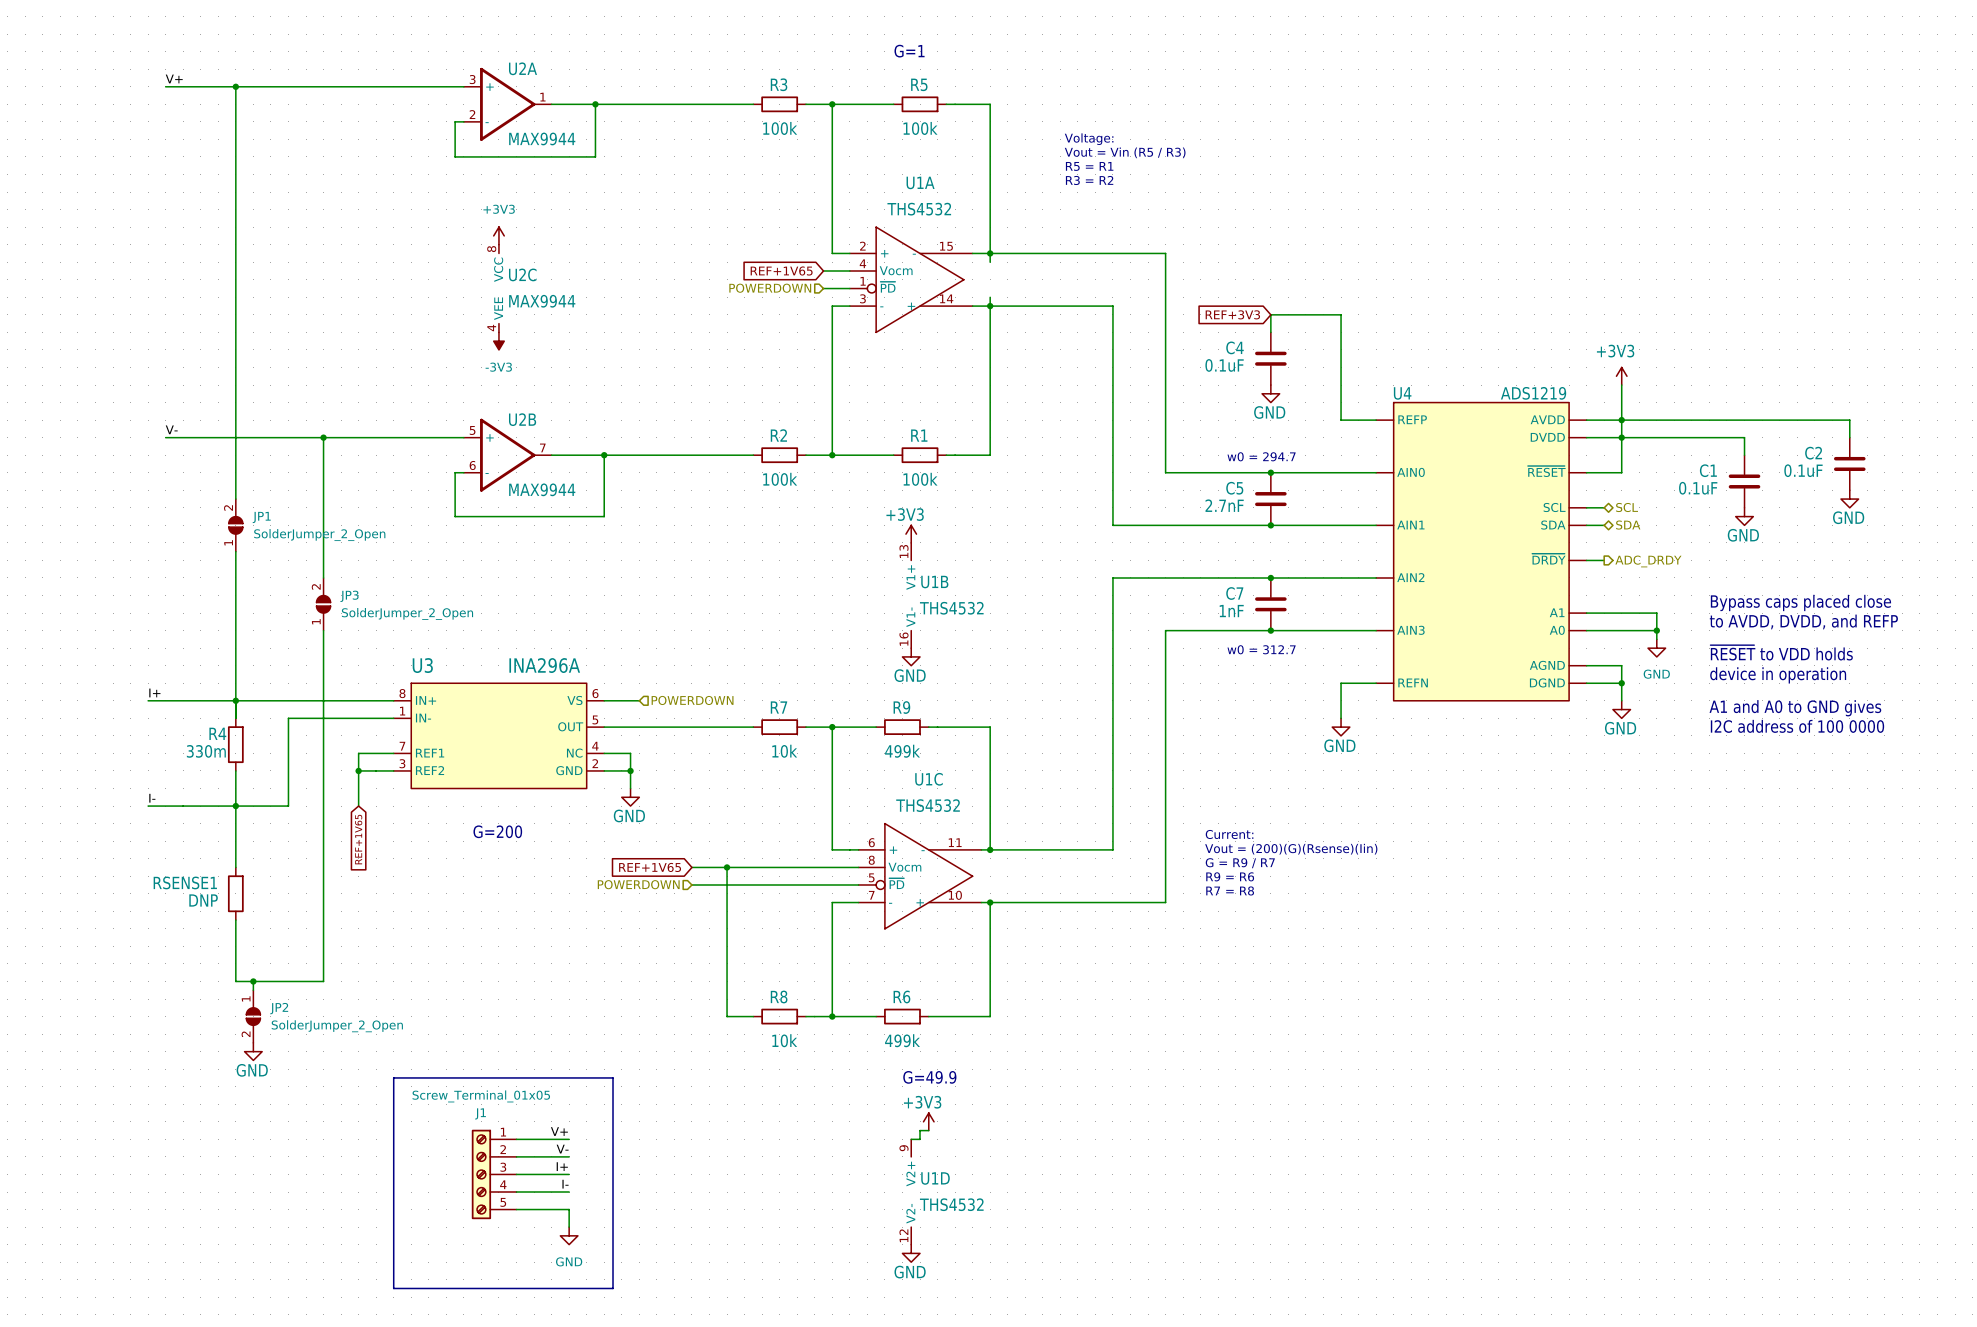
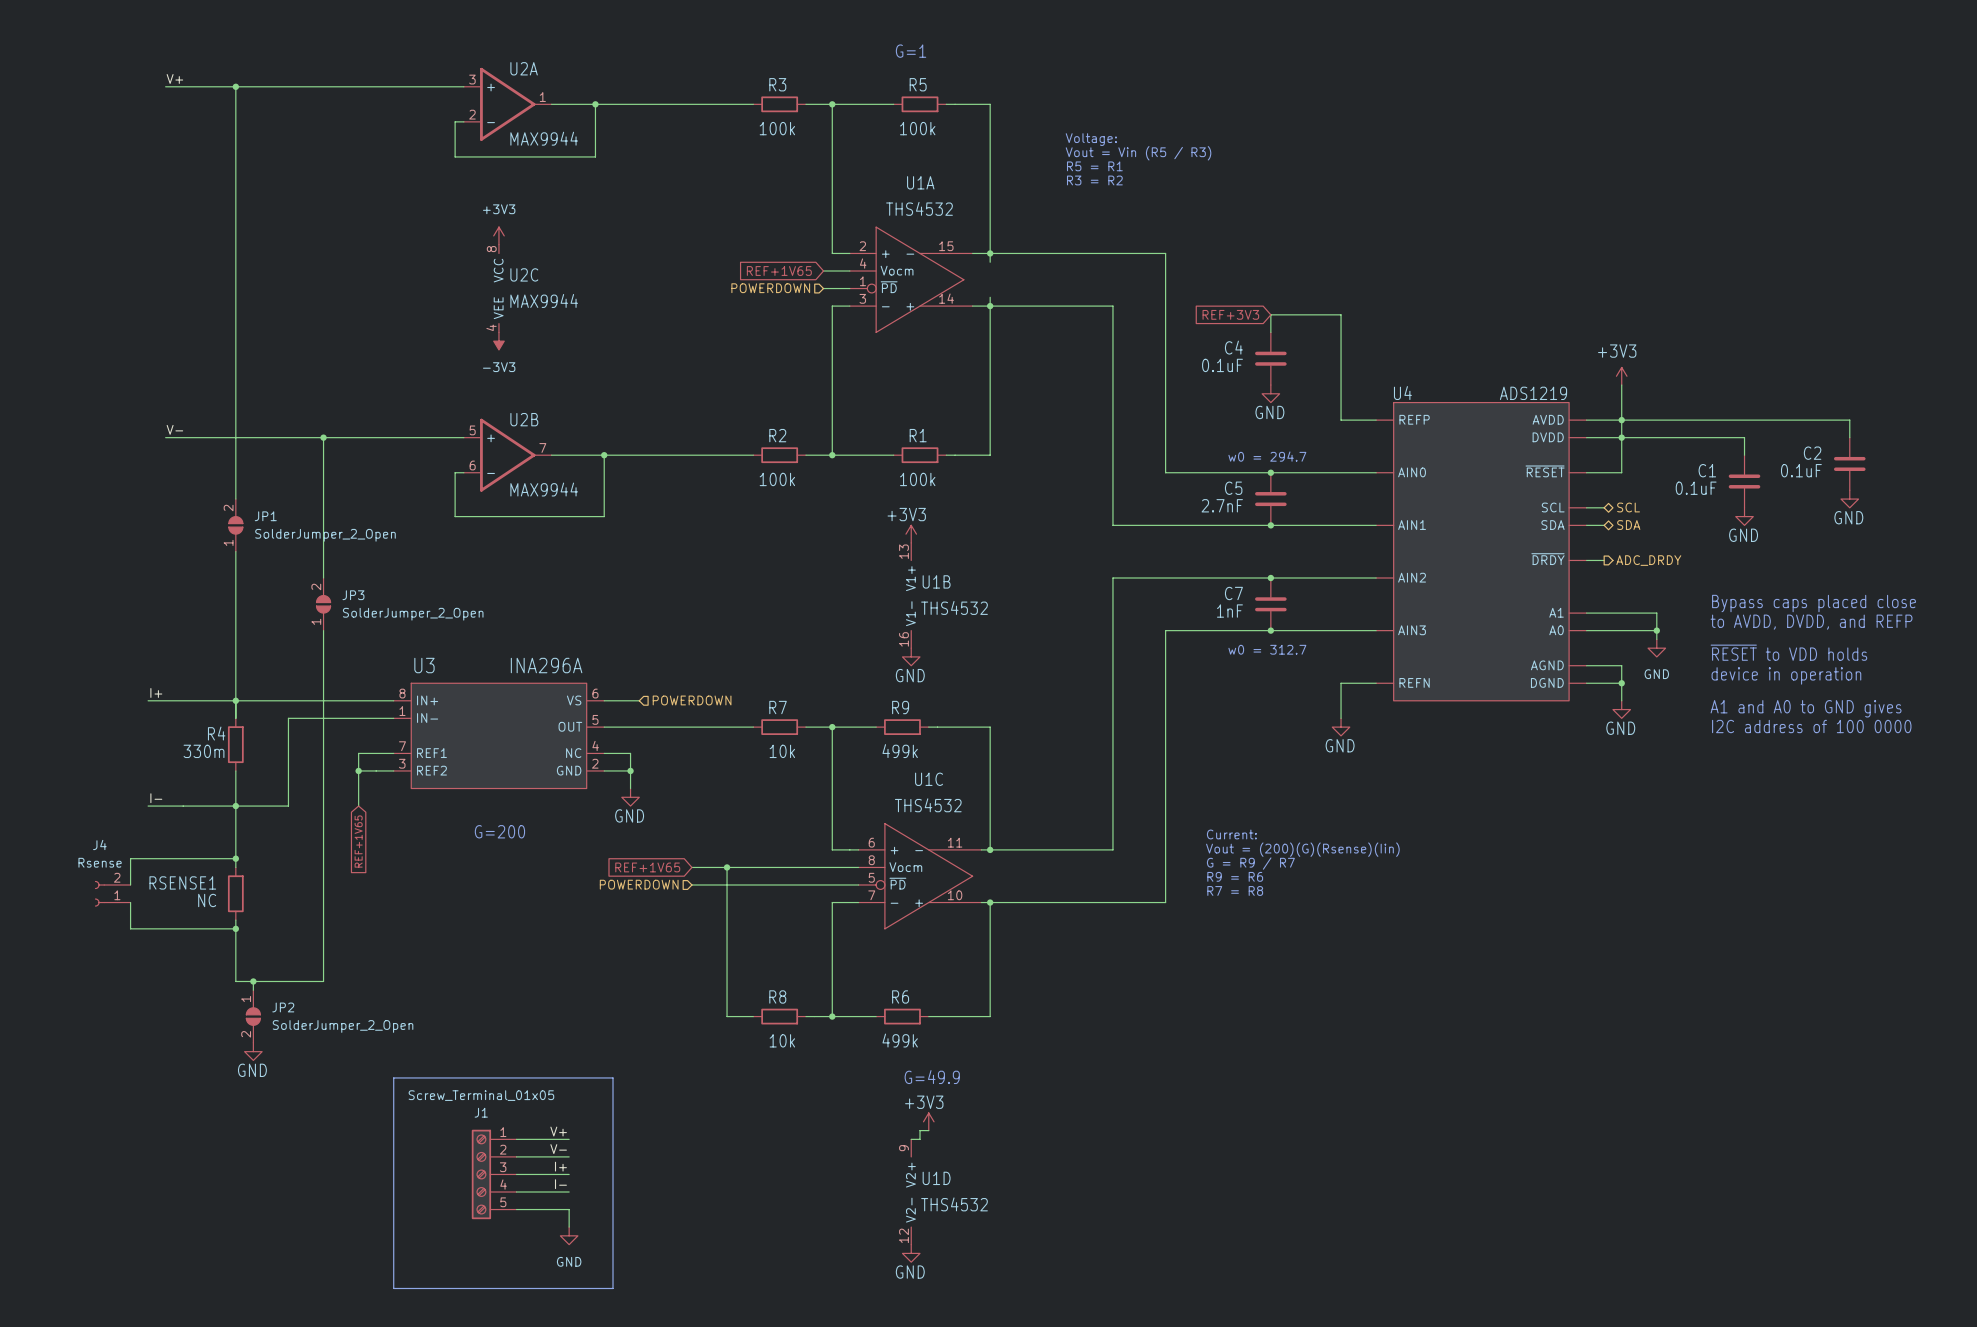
wire: none -> (235, 858) (130, 858) (130, 885)
junction: none -> (235, 858)
J4: none -> Rsense (112, 893)
RSENSE1 value: DNP (203, 900) -> NC (207, 900)
wire: none -> (130, 902) (130, 928) (235, 928)
junction: none -> (235, 928)

